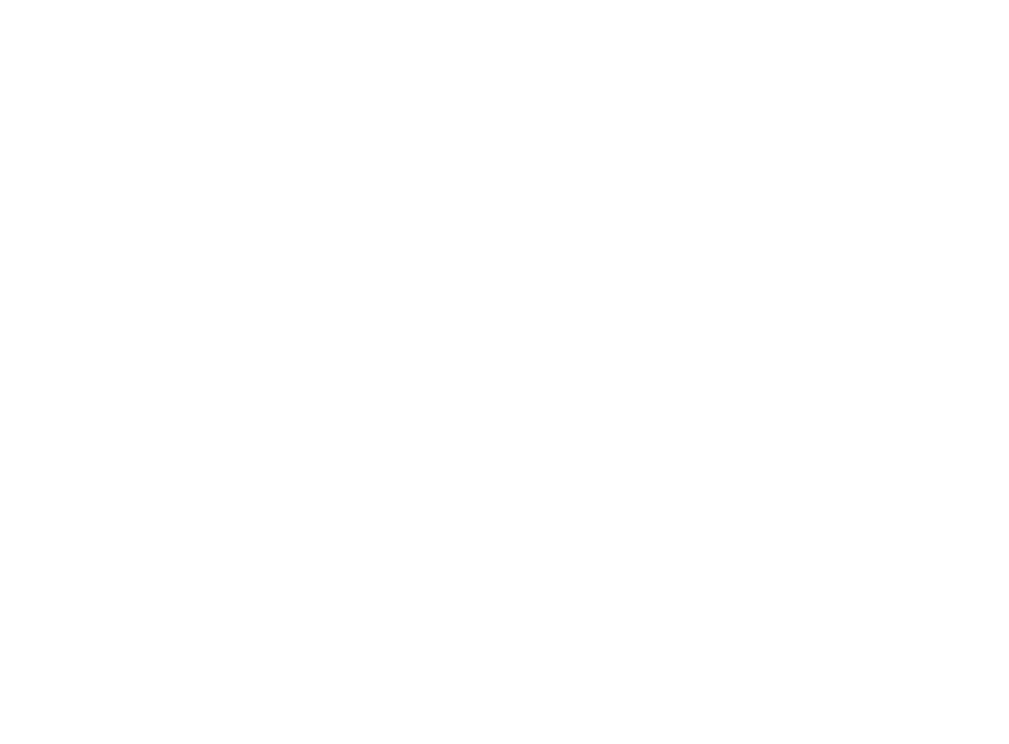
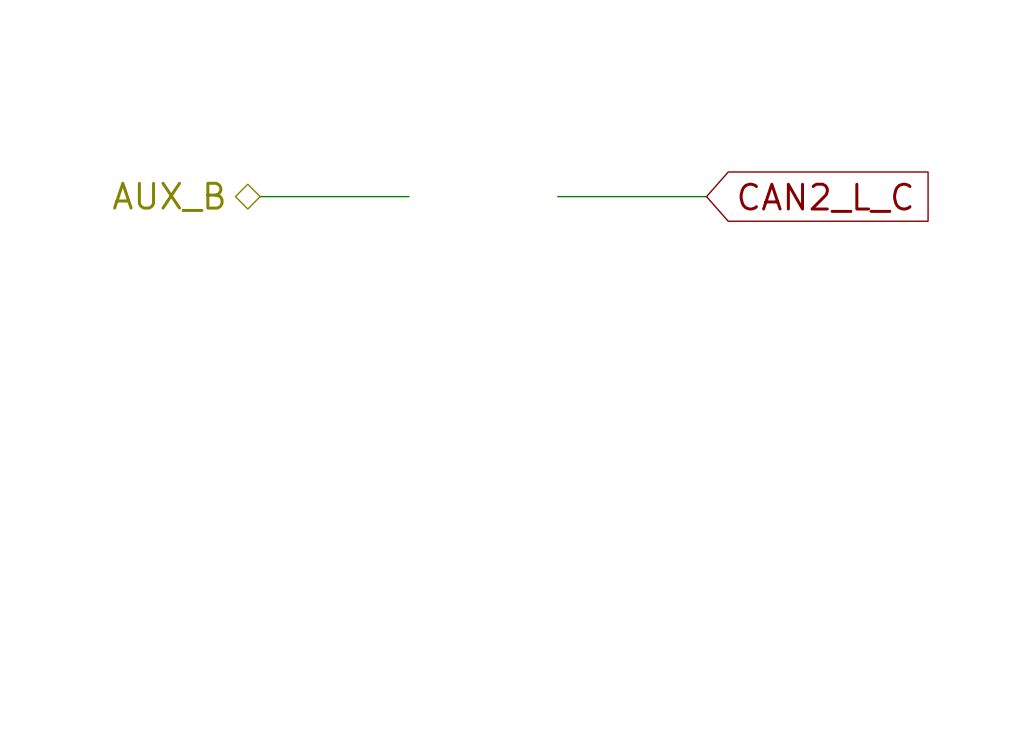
hierarchical label: none -> AUX_B (168, 196)
wire: none -> (260, 196) (408, 196)
wire: none -> (557, 196) (706, 196)
global label: none -> CAN2_L_C (825, 197)

